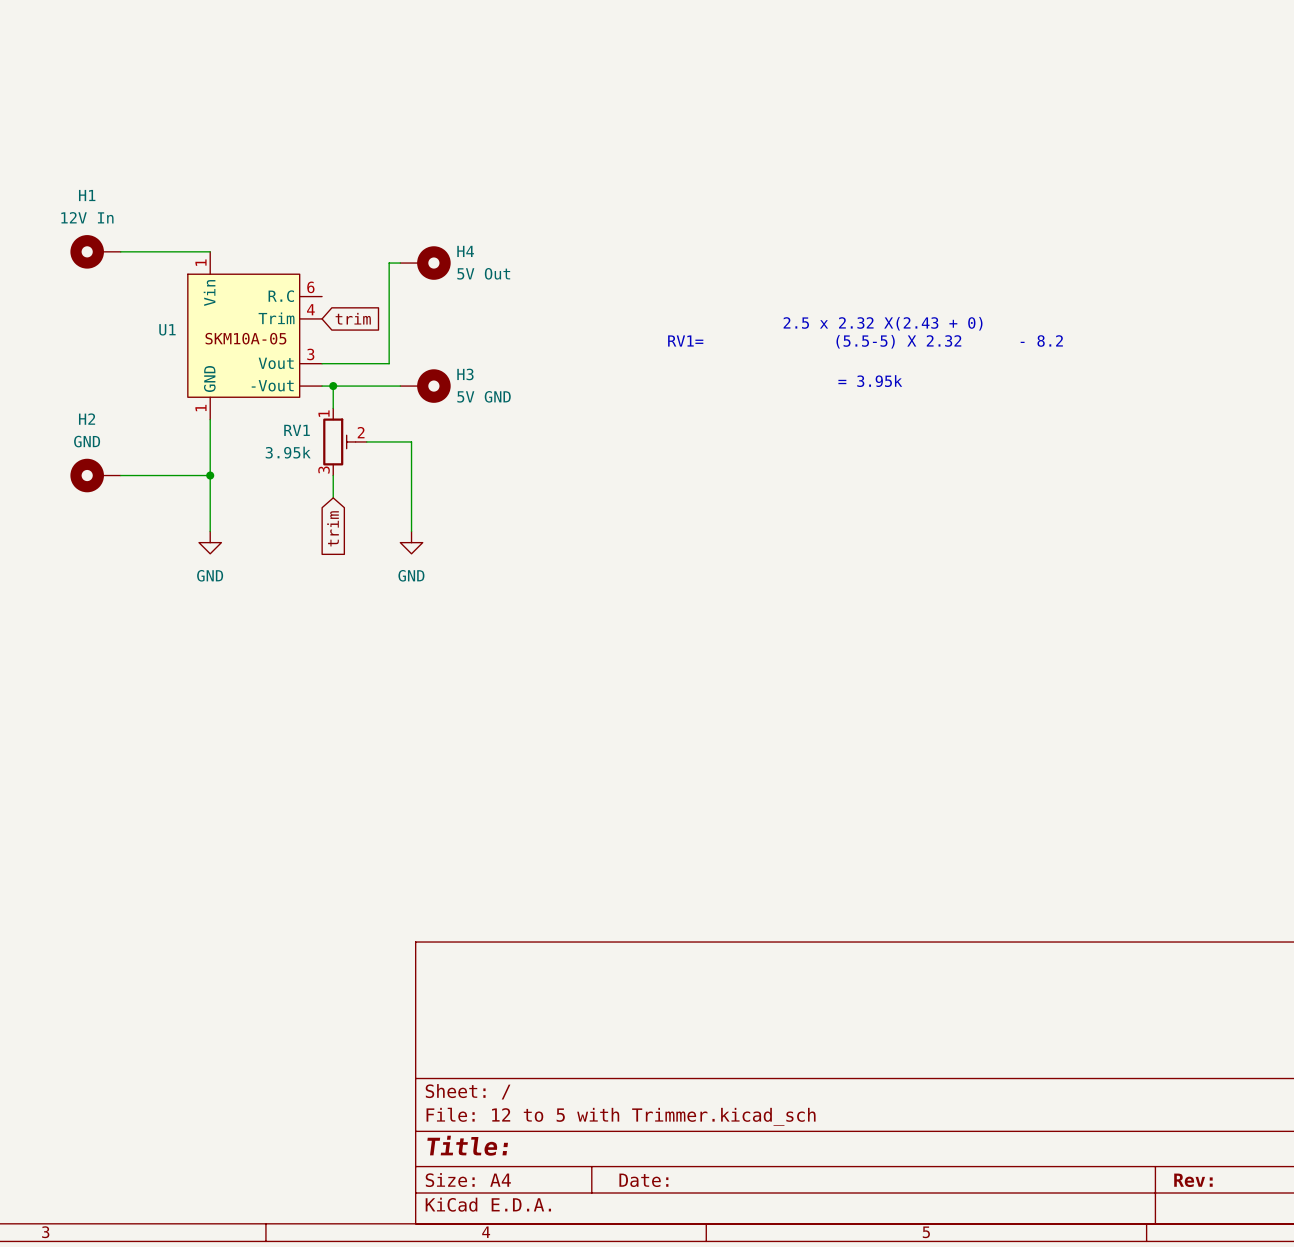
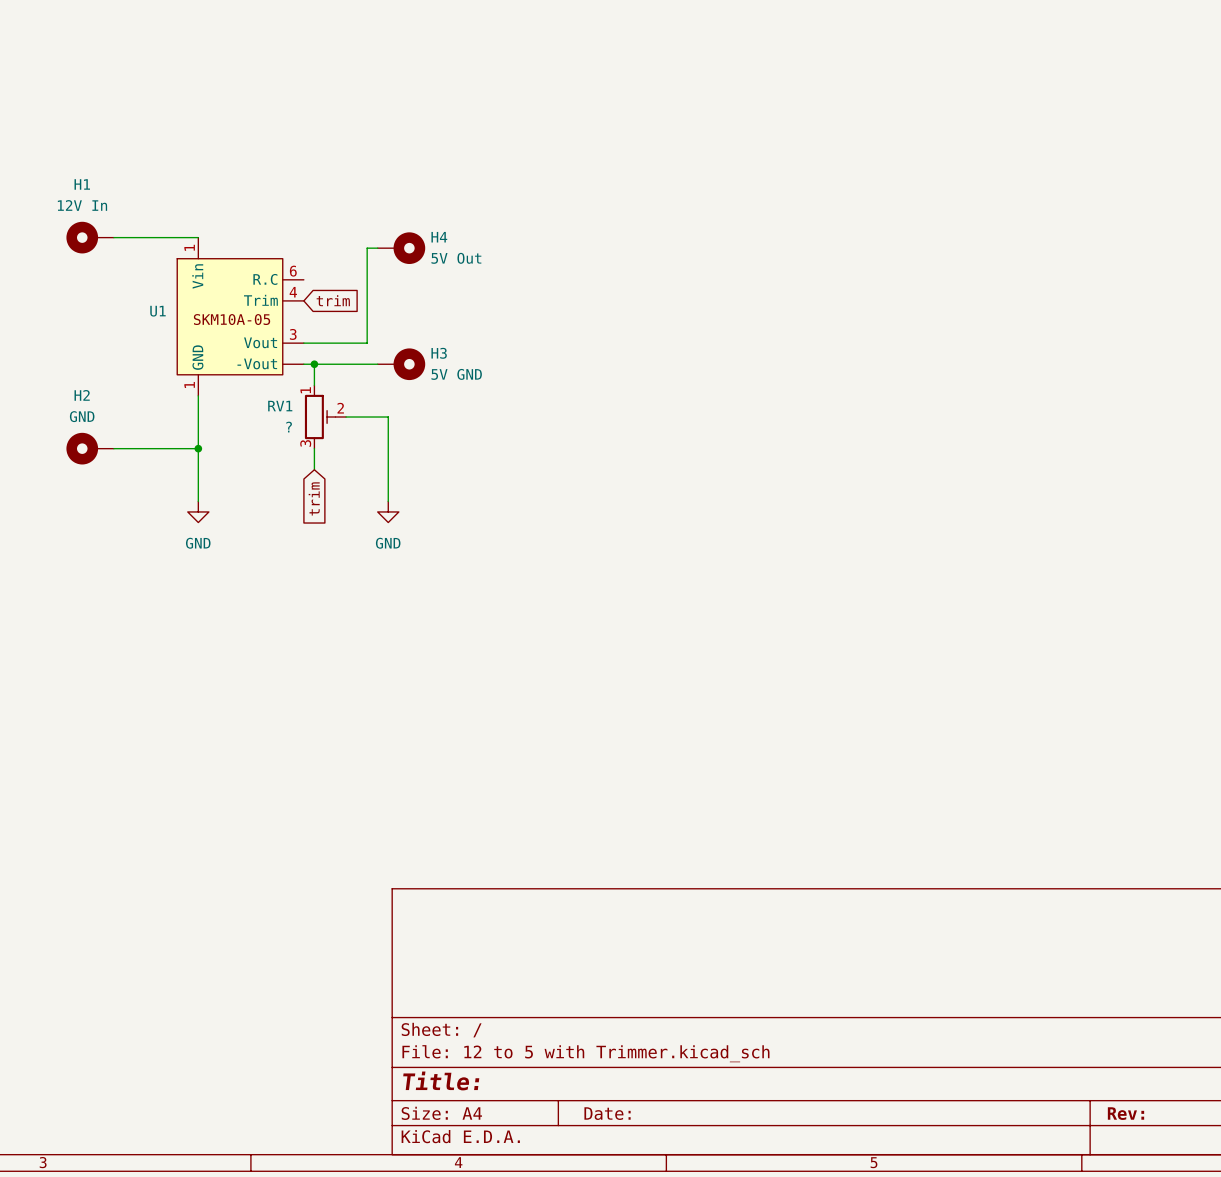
text: 2.5 x 2.32 X(2.43 + 0) (883, 323) -> none
text: RV1= (5.5-5) X 2.32 - 8.2 (865, 341) -> none
text: = 3.95k (870, 381) -> none
RV1 value: 3.95k (288, 452) -> ? (289, 427)

